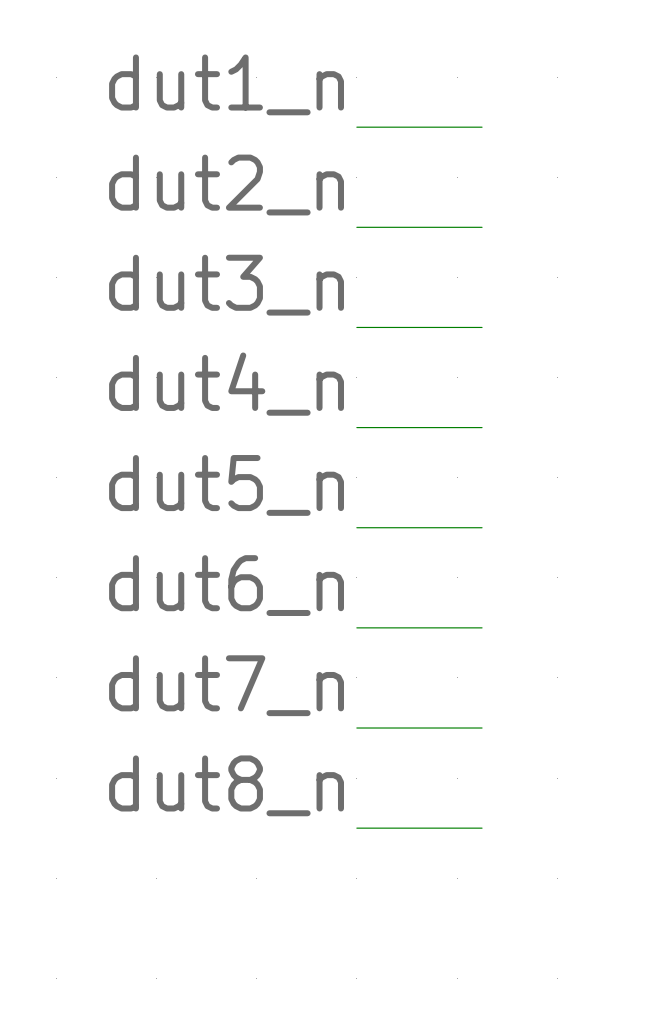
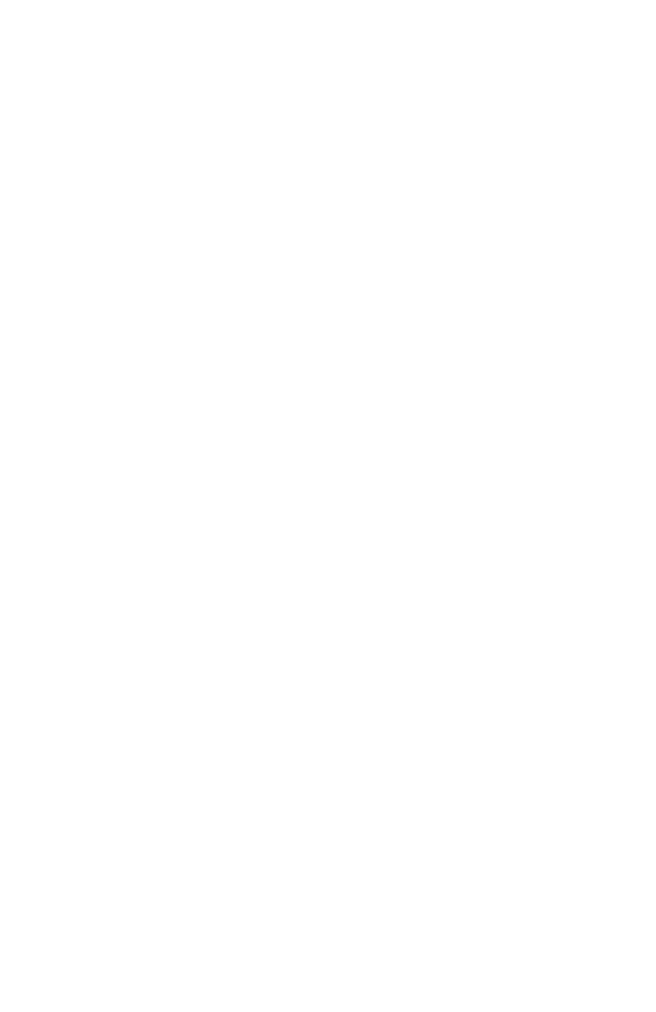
label: dut1_n (226, 84) -> none
wire: (356, 127) (482, 127) -> none
label: dut2_n (226, 185) -> none
wire: (356, 227) (482, 227) -> none
label: dut3_n (226, 285) -> none
wire: (356, 327) (482, 327) -> none
label: dut4_n (226, 384) -> none
wire: (356, 427) (482, 427) -> none
label: dut5_n (226, 485) -> none
wire: (356, 527) (482, 527) -> none
label: dut6_n (226, 585) -> none
wire: (356, 627) (482, 627) -> none
label: dut7_n (226, 685) -> none
wire: (356, 728) (482, 728) -> none
label: dut8_n (226, 785) -> none
wire: (356, 828) (482, 828) -> none

